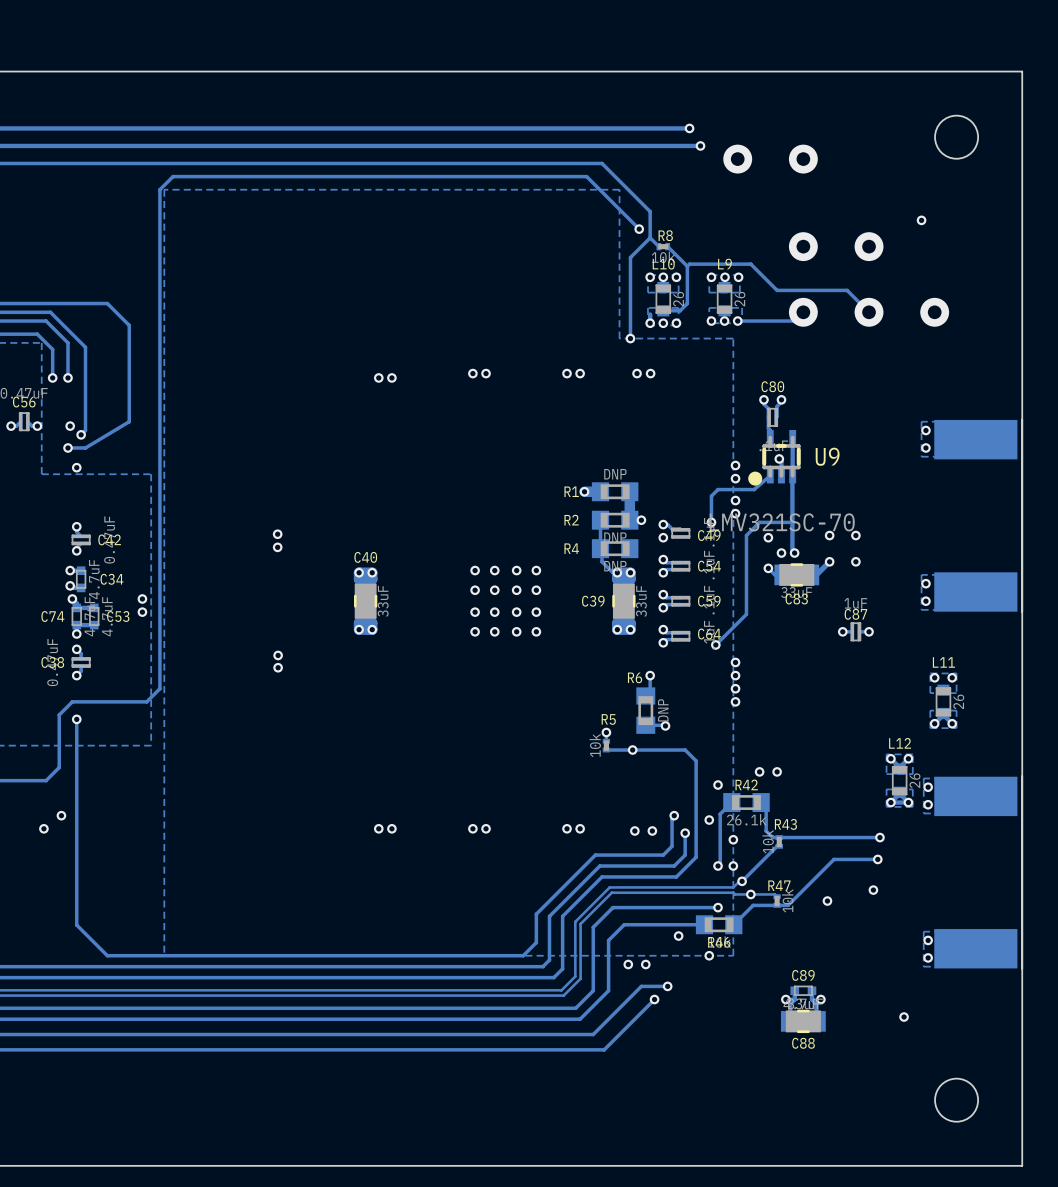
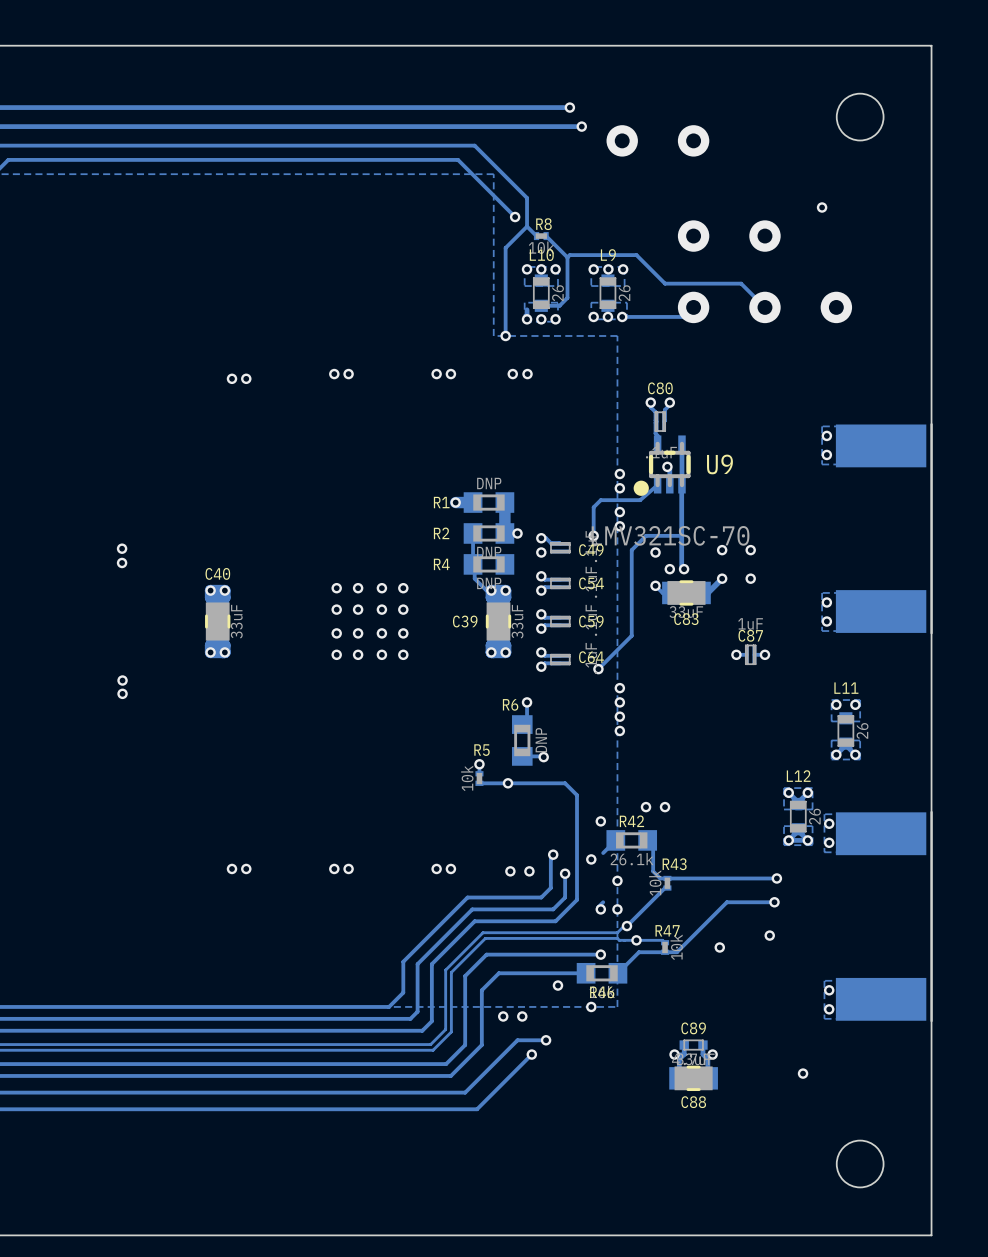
track: (720, 814) (720, 863) (718, 866) -> (603, 902) (598, 907) (600, 909)

